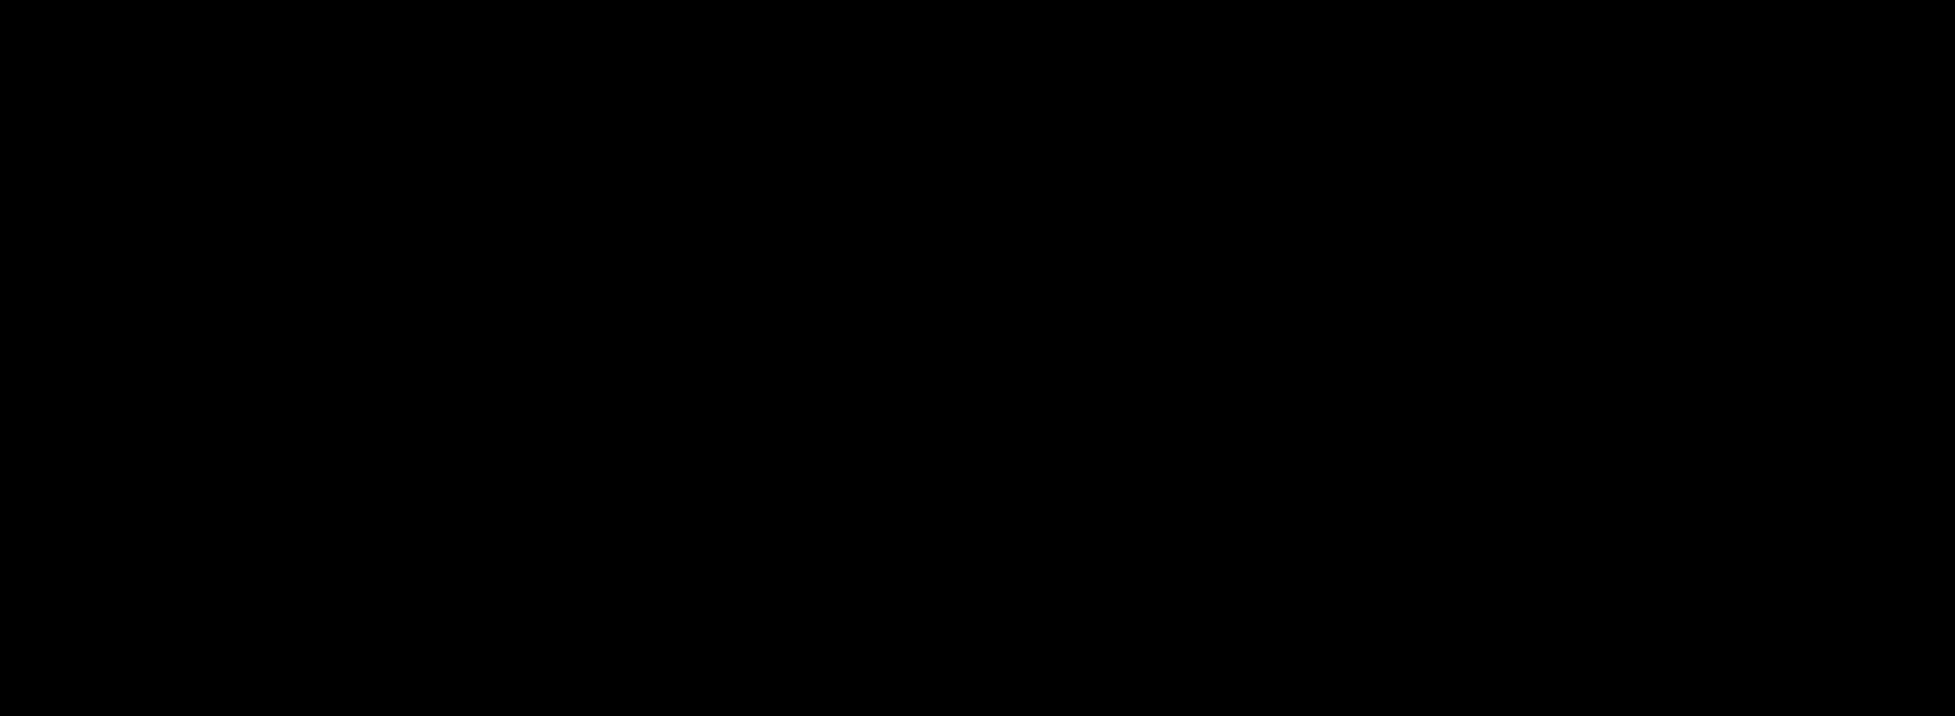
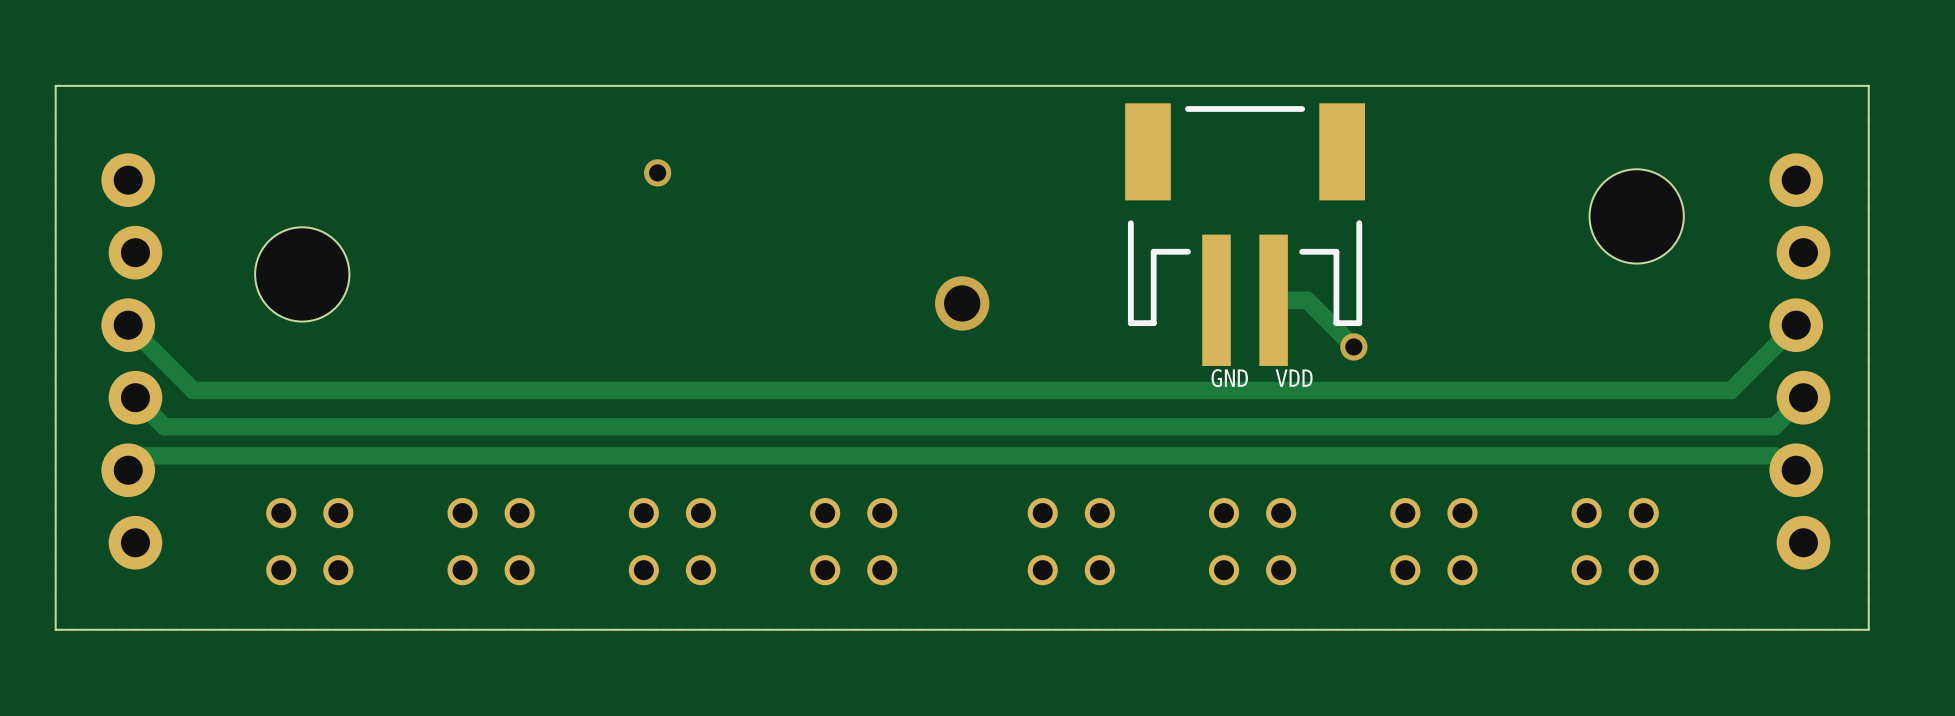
board edge: none -> (1868, 85) (55, 85) (55, 629) (1868, 629) (1868, 85)
via: none -> (657, 172)
part: none -> (1636, 216)
part: none -> (1245, 234)
part: none -> (302, 274)
track: none -> (1273, 300) (1307, 300) (1353, 346)
via: none -> (962, 303)
track: none -> (1796, 325) (1730, 390) (193, 390) (128, 325)
via: none -> (1353, 346)
part: none -> (131, 361)
part: none -> (1799, 361)
text: none -> GND VDD (1262, 378)
track: none -> (1803, 397) (1774, 426) (164, 426) (135, 397)
track: none -> (1796, 470) (1788, 470) (1774, 455) (142, 455) (128, 470)
part: none -> (309, 541)
part: none -> (491, 541)
part: none -> (672, 541)
part: none -> (853, 541)
part: none -> (1071, 541)
part: none -> (1252, 541)
part: none -> (1433, 541)
part: none -> (1615, 541)

